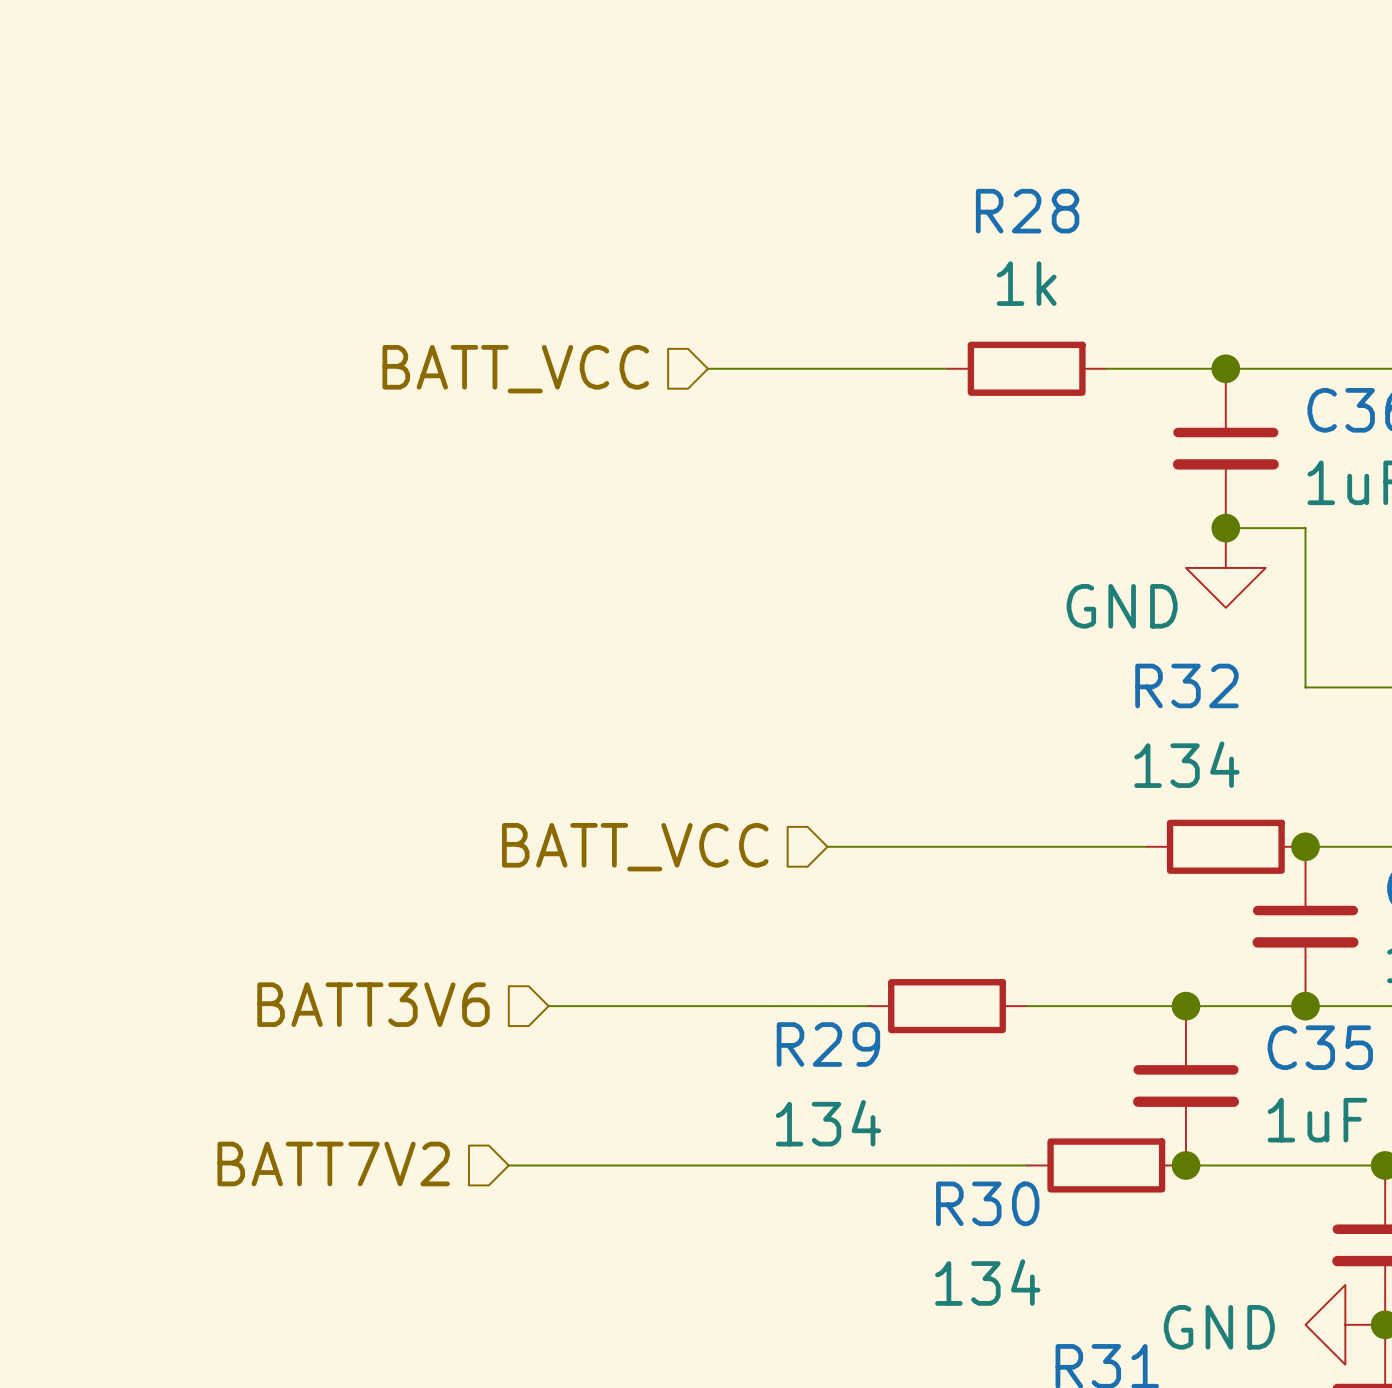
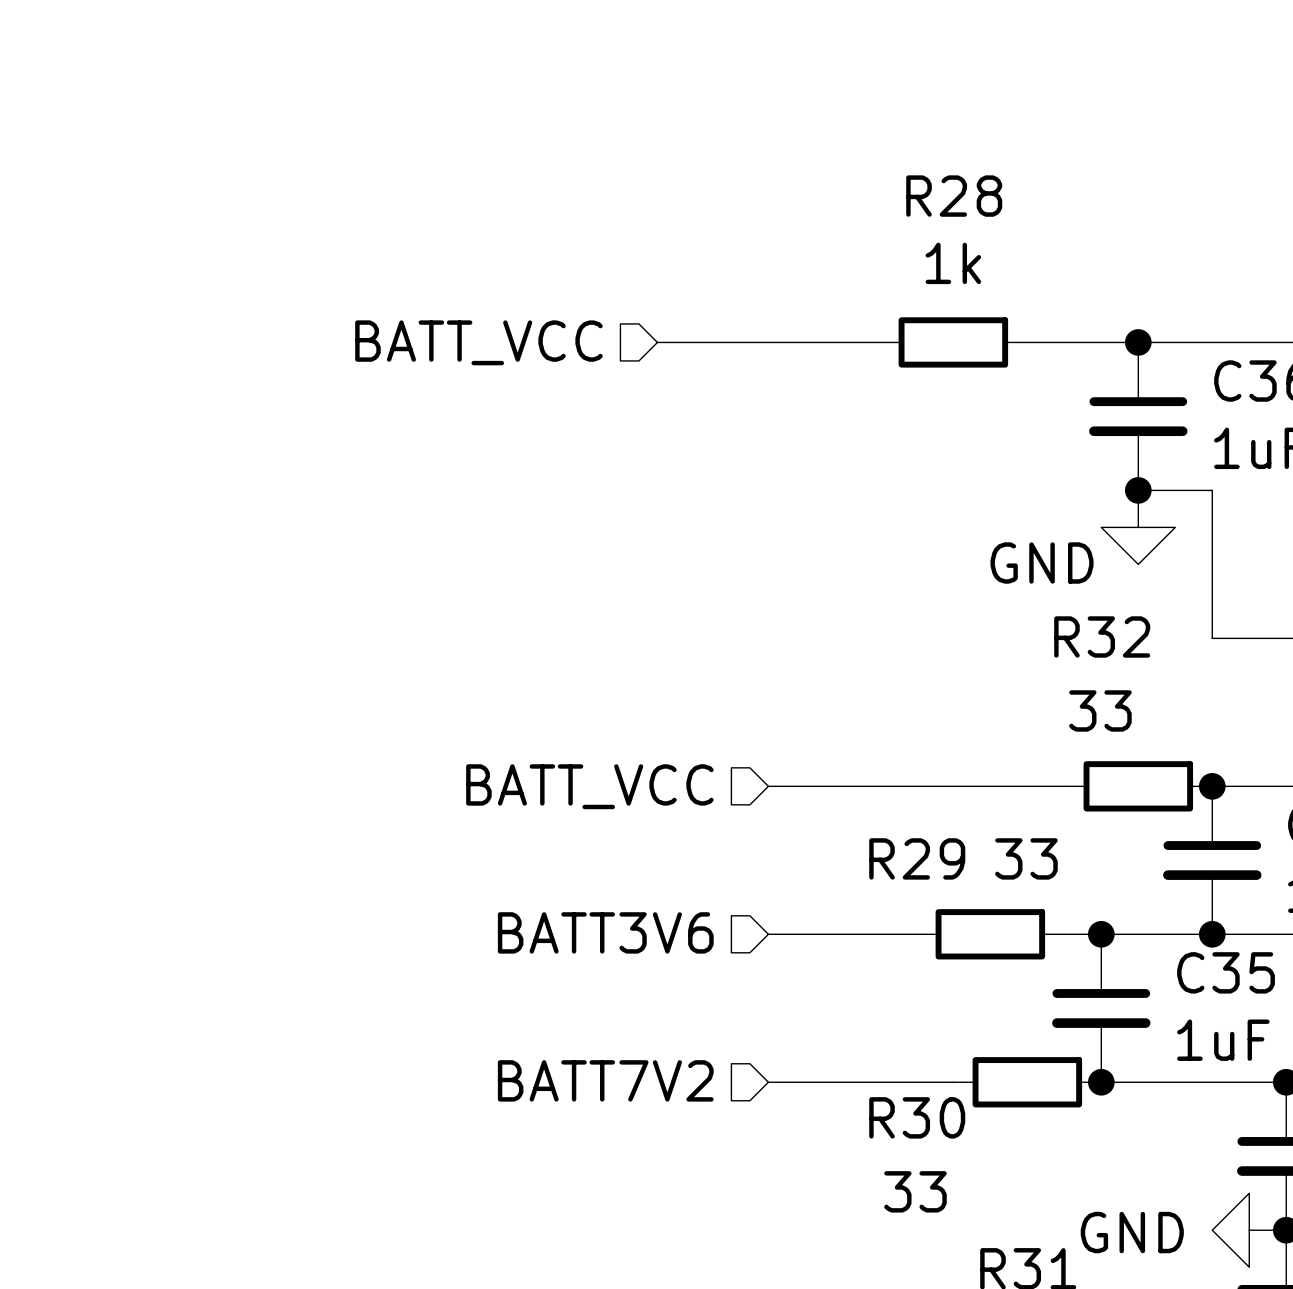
R32 value: 134 (1186, 764) -> 33 (1100, 710)
hierarchical label position: BATT3V6 (373, 1004) -> BATT3V6 (605, 932)
wire: (548, 1006) (827, 1006) -> none
R29 position: (946, 1006) -> (990, 934)
wire: (1026, 1006) (1146, 1006) -> (805, 934) (916, 934)
R29 name position: R29 (828, 1044) -> R29 (917, 858)
R29 value: 134 (828, 1123) -> 33 (1026, 858)
hierarchical label position: BATT7V2 (333, 1163) -> BATT7V2 (605, 1080)
wire: (508, 1165) (827, 1165) -> none
R30 value: 134 (987, 1282) -> 33 (915, 1191)

